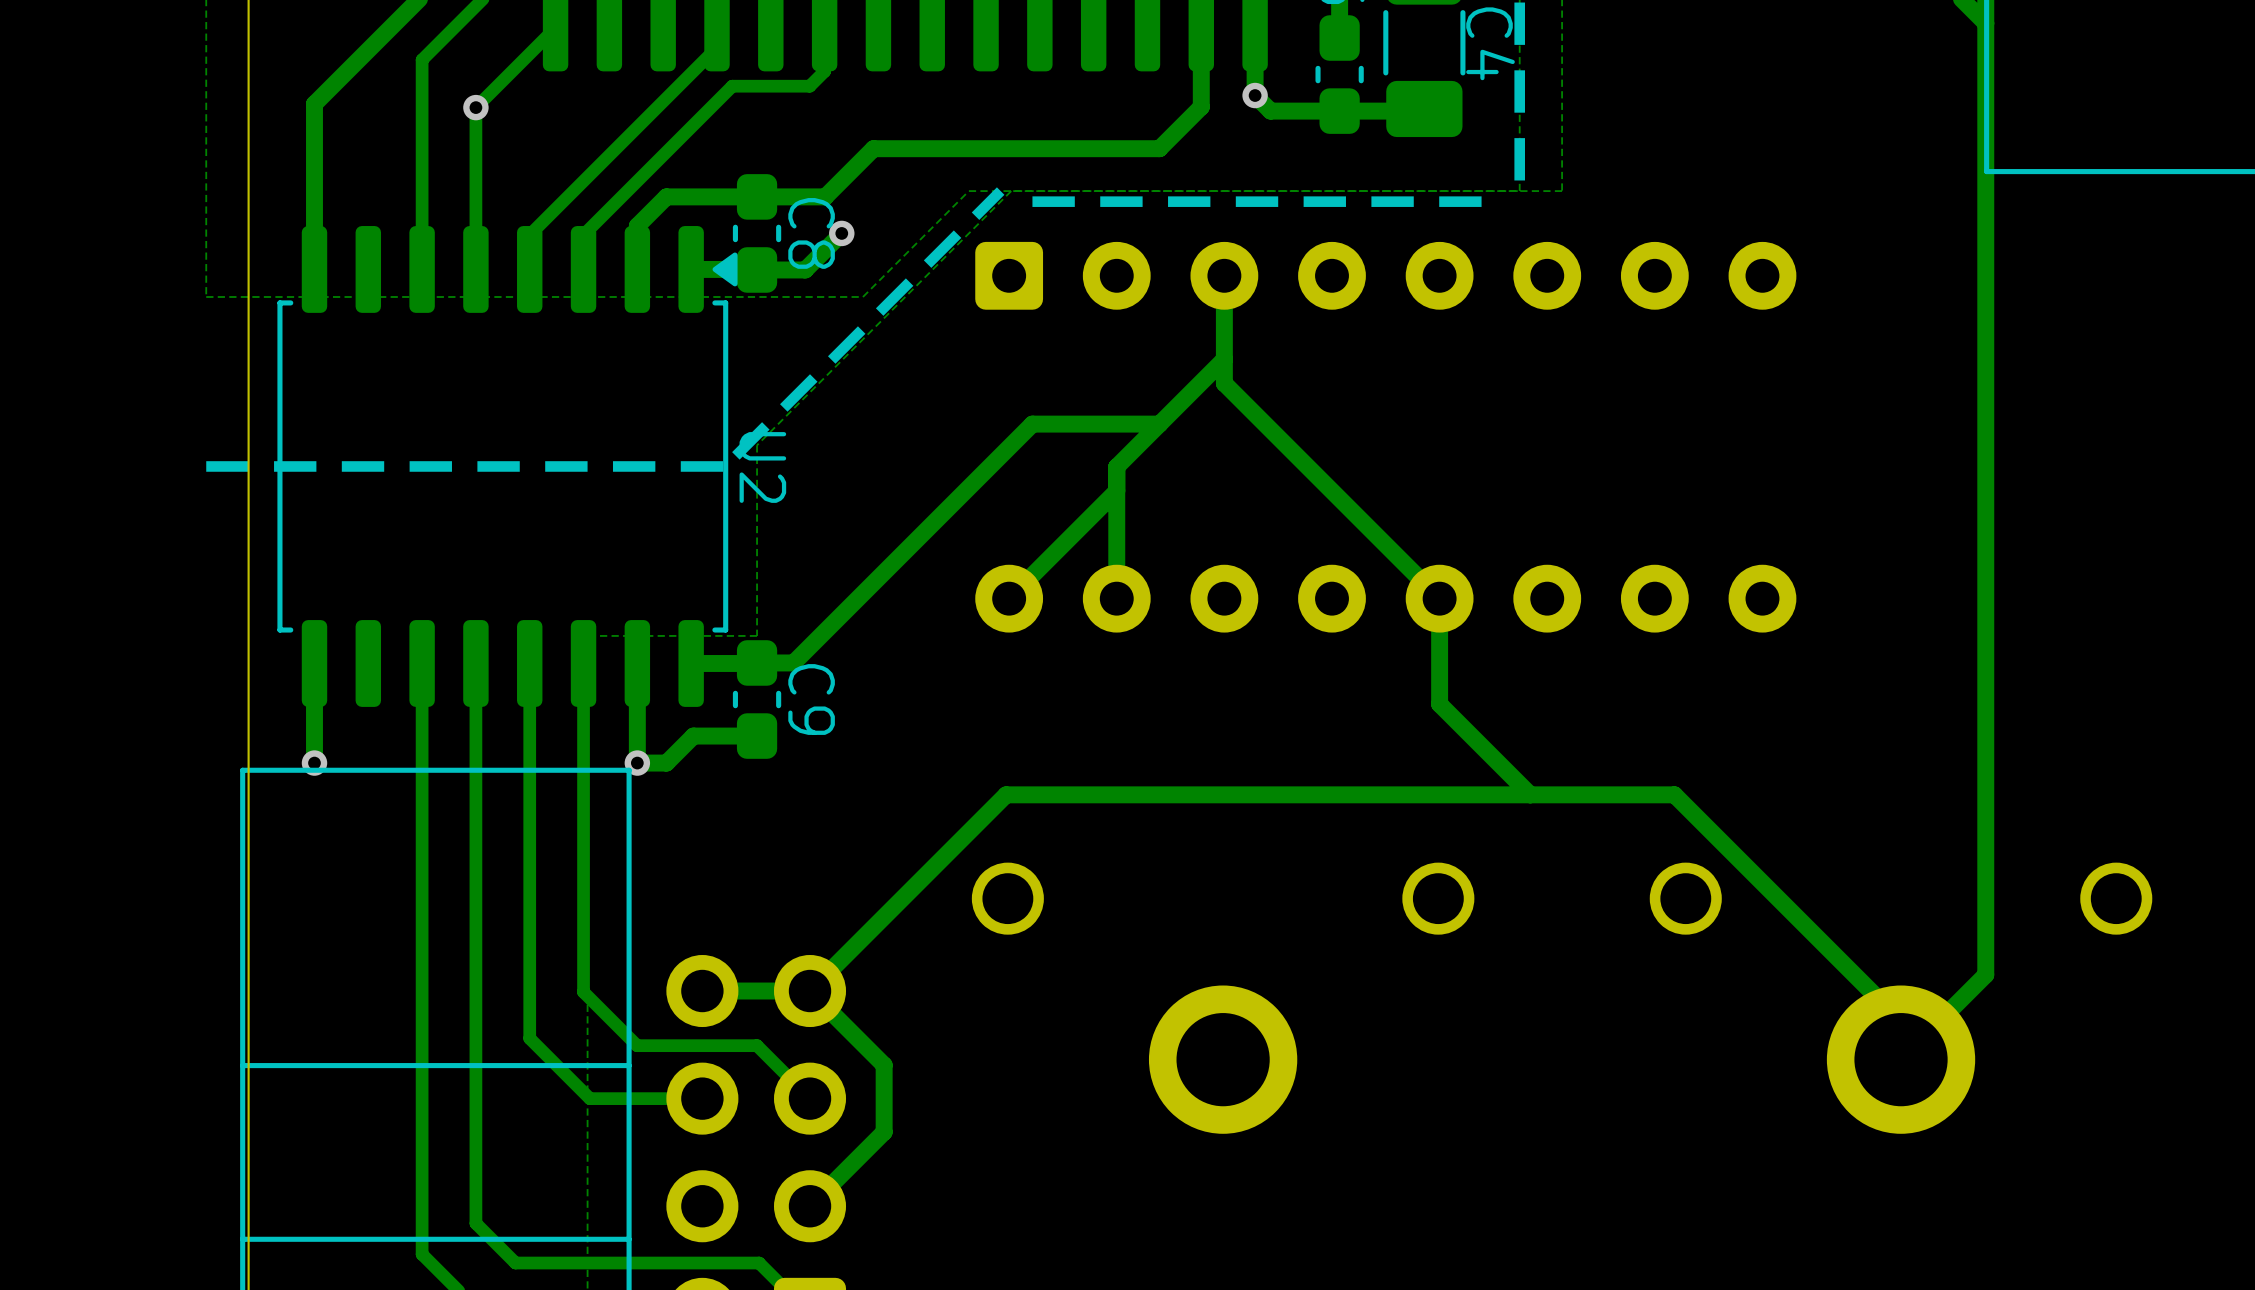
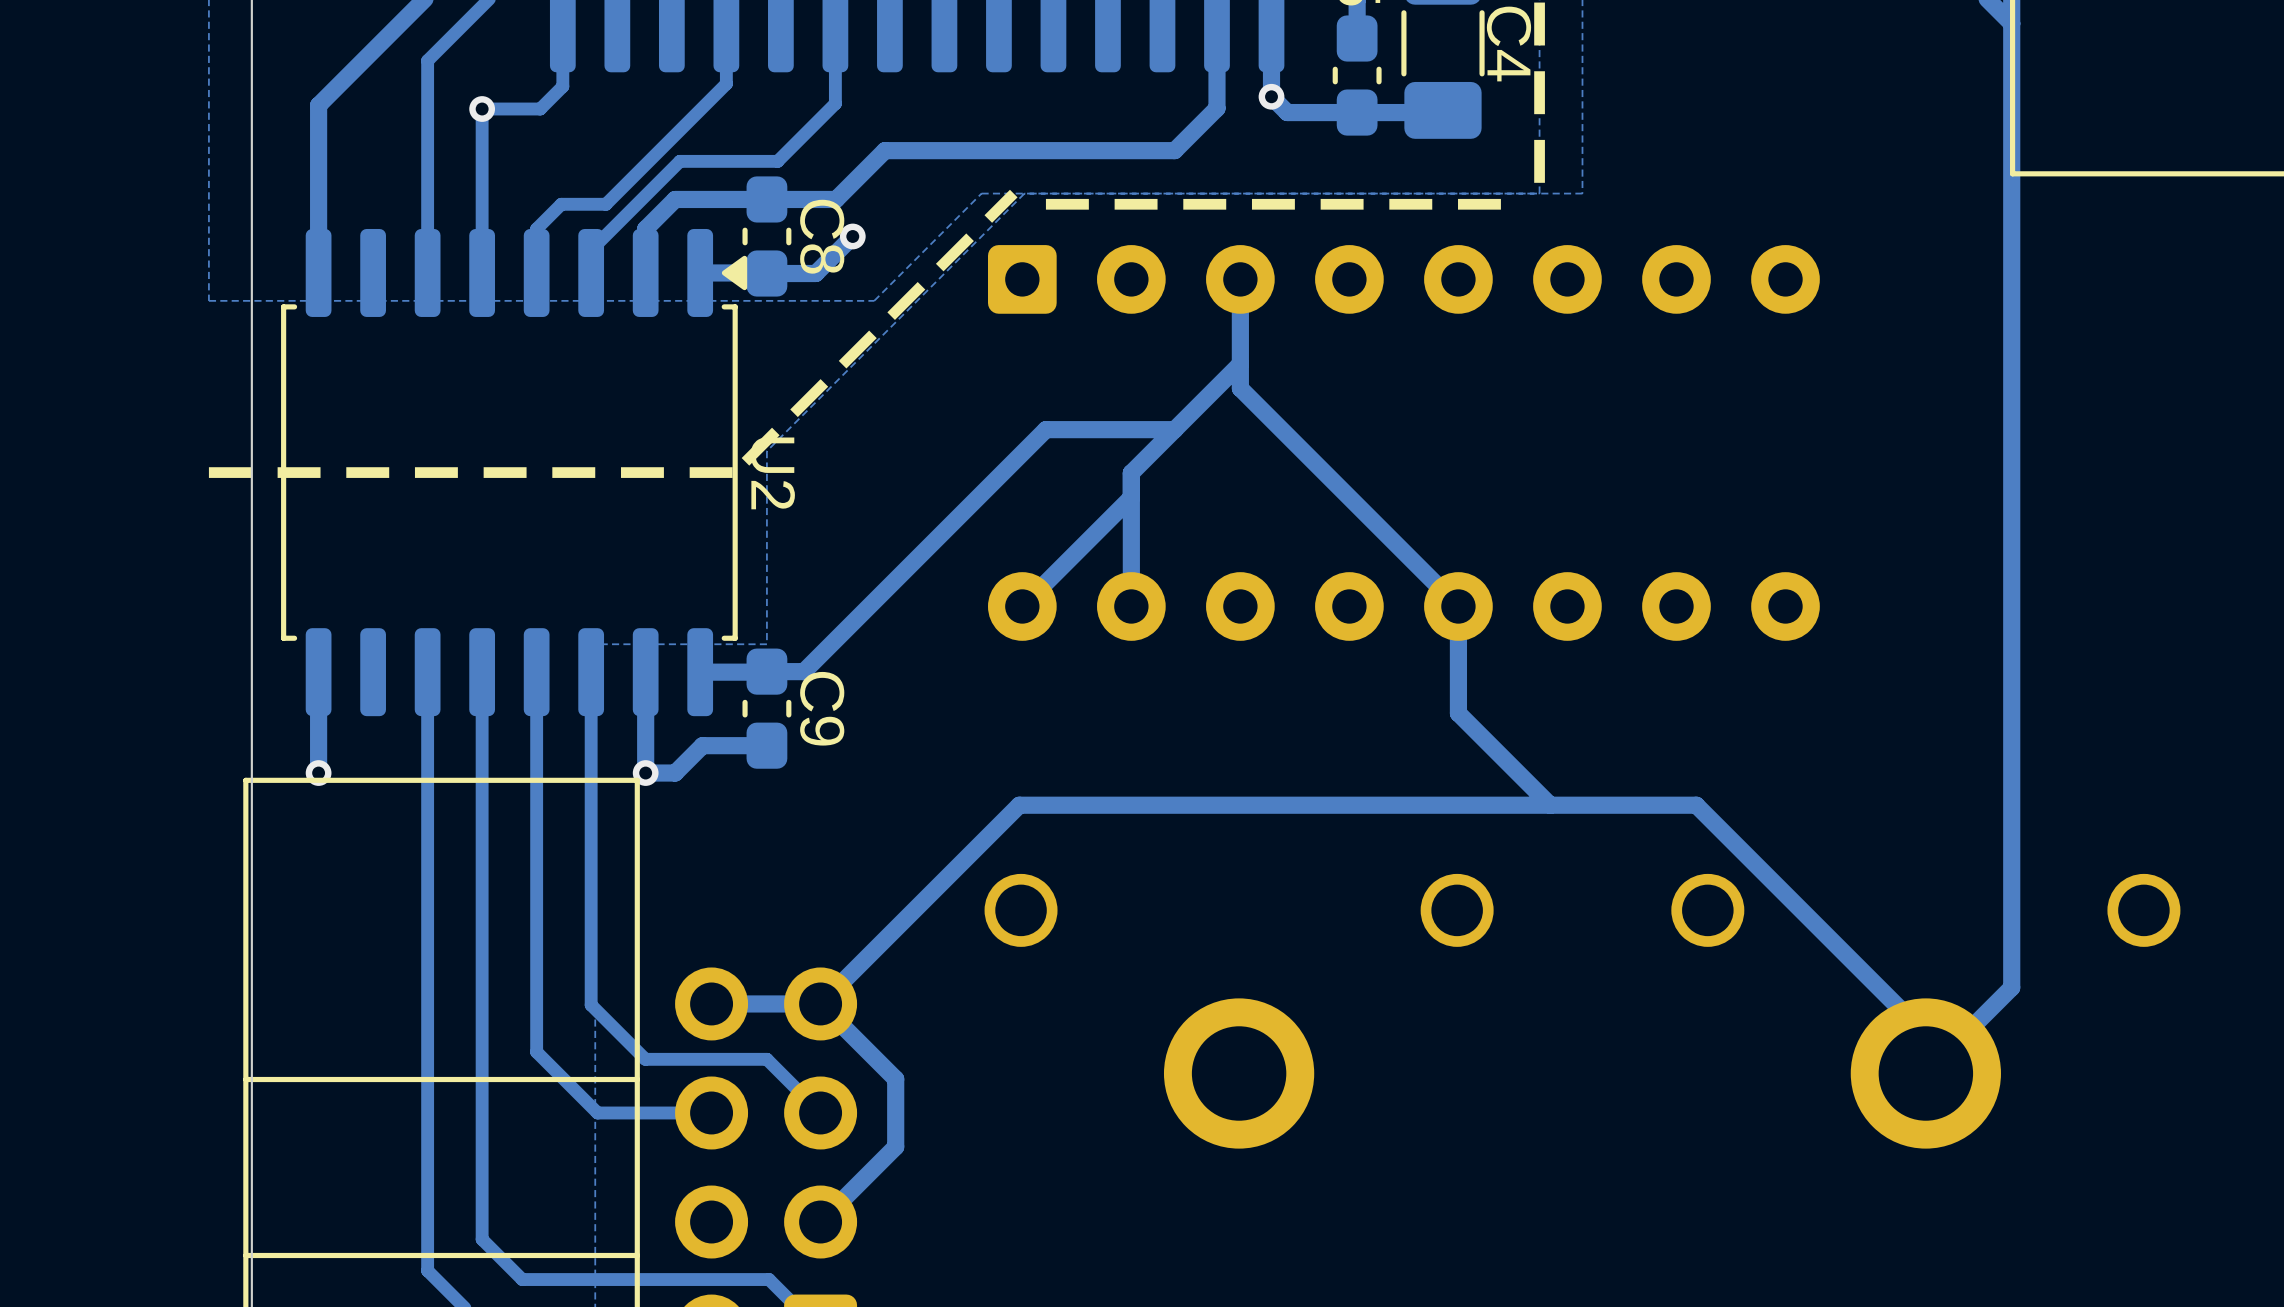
track: (555, 27) (475, 107) -> (562, 28) (562, 86) (540, 109) (482, 109)
track: none -> (726, 28) (726, 83) (605, 204) (561, 204) (536, 228) (536, 272)
track: (717, 47) (529, 234) -> none
track: (824, 71) (809, 86) (732, 86) (583, 234) -> (835, 72) (835, 103) (777, 161) (679, 161) (591, 250)

